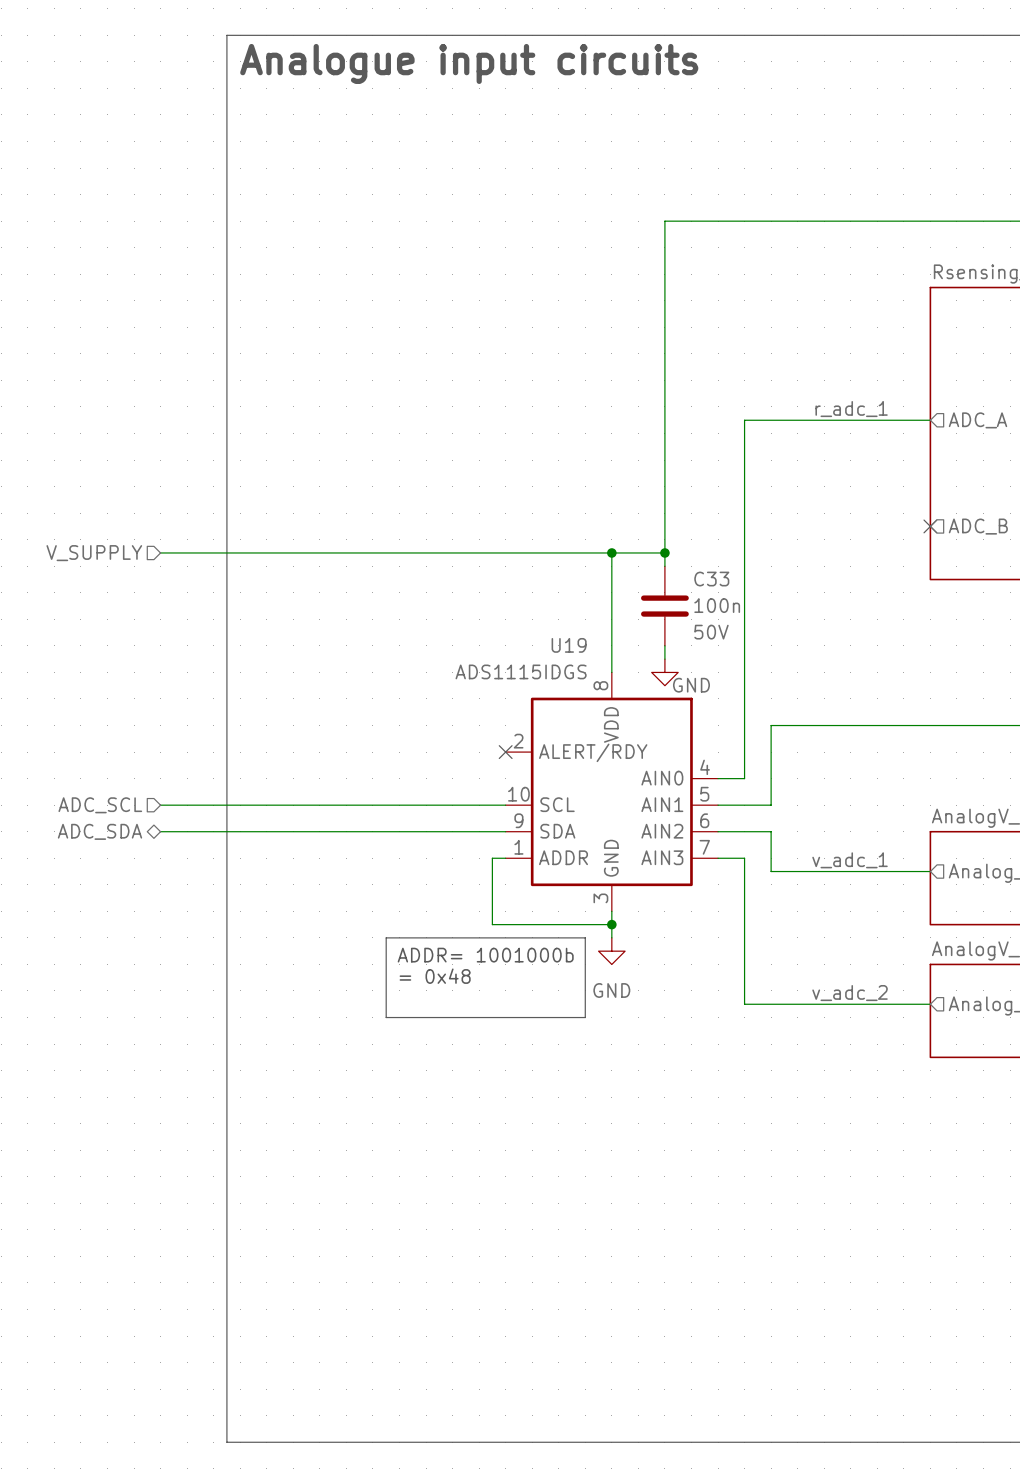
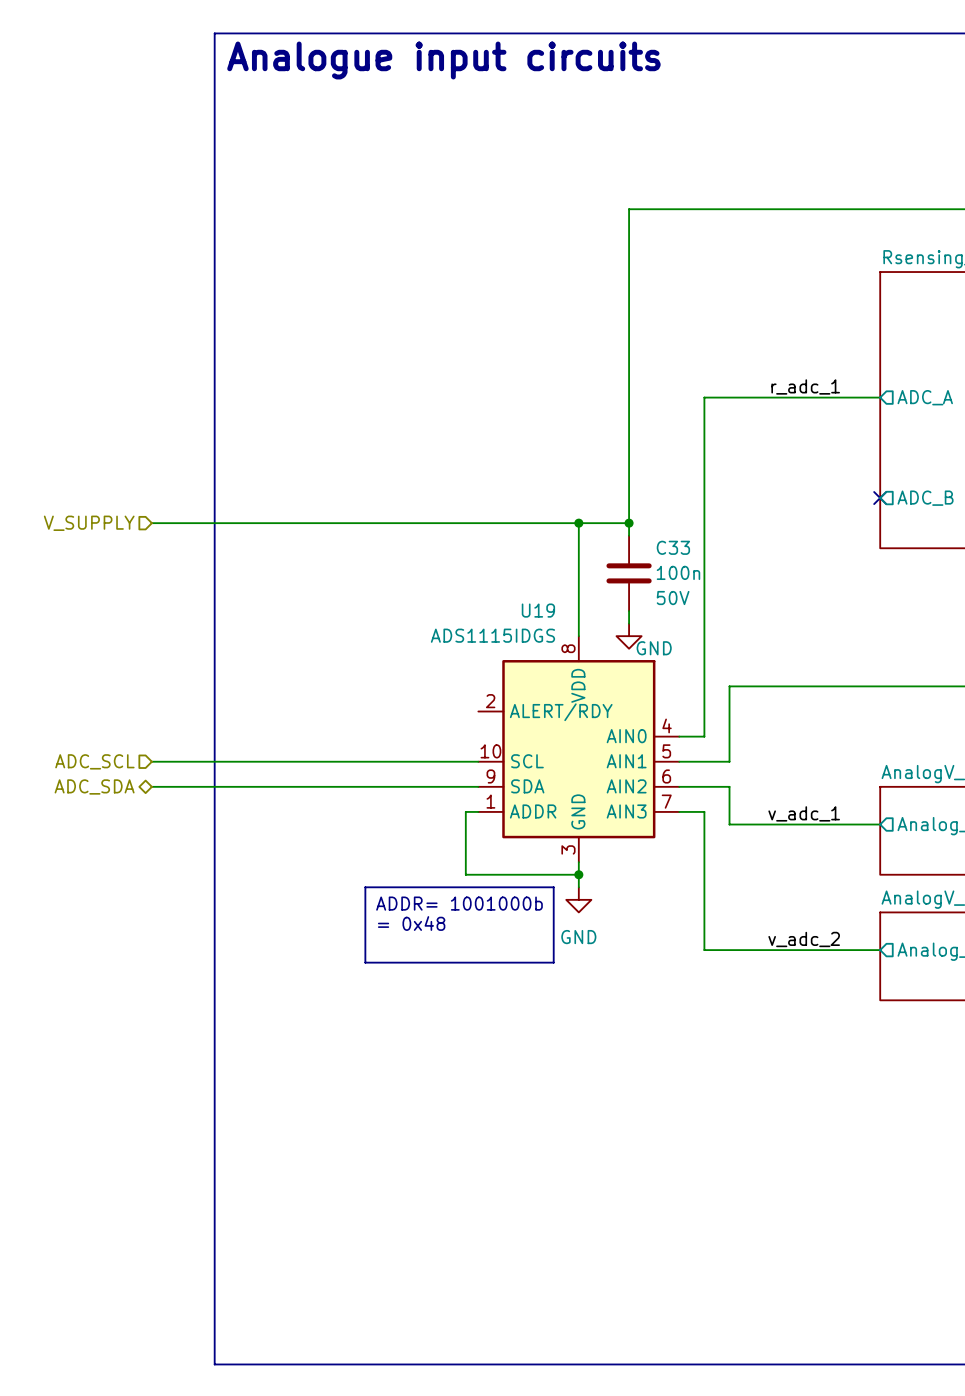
no-connect mark: (505, 752) -> none

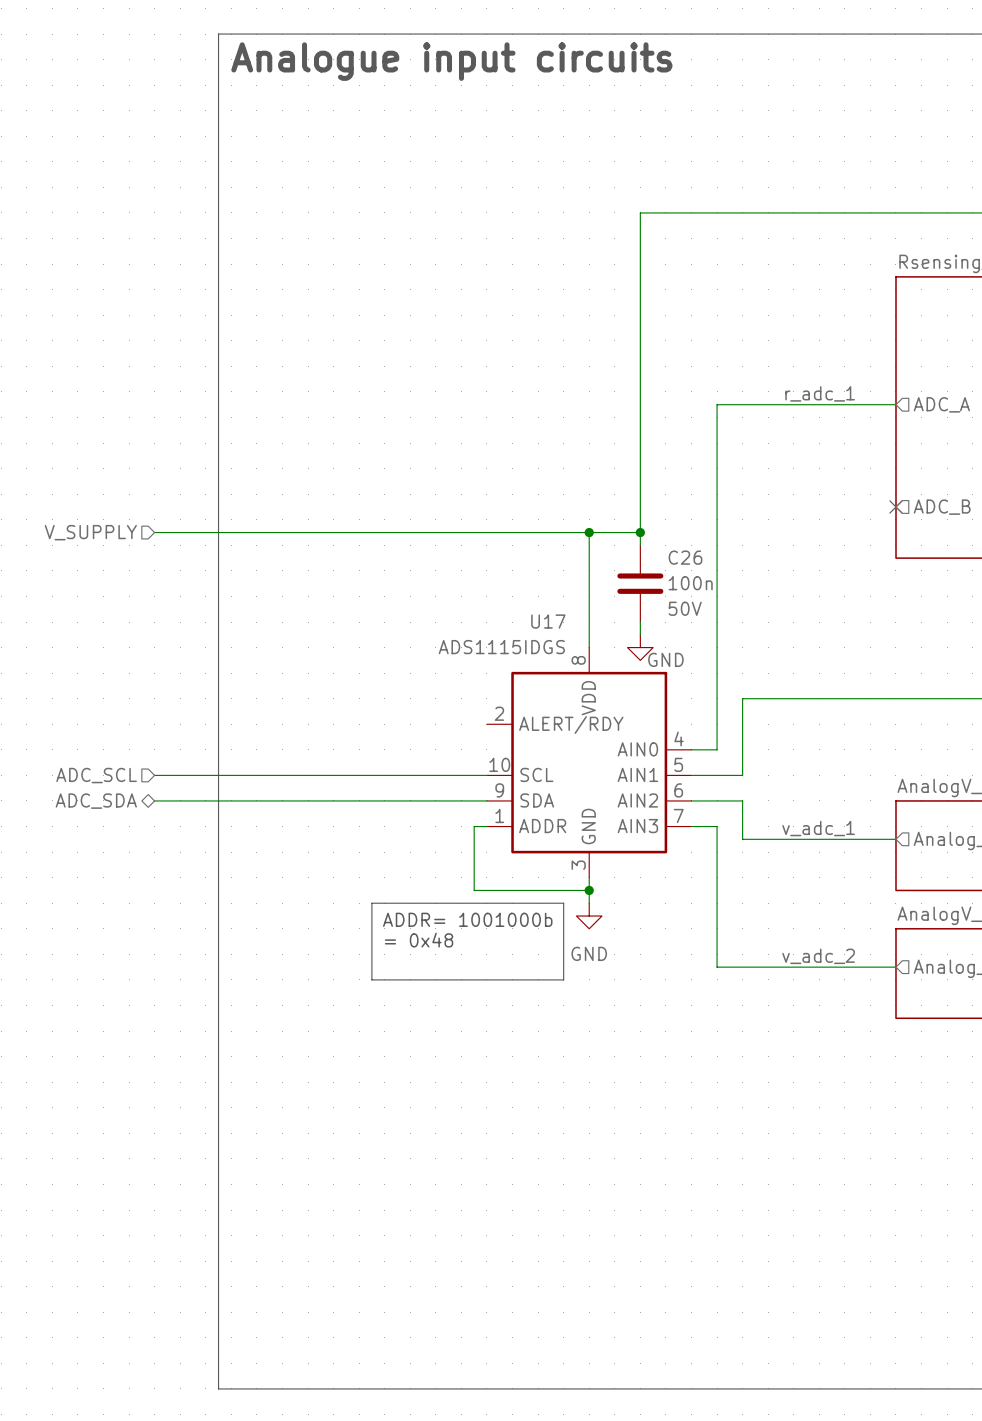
C33 name: C33 (673, 547) -> C26 (685, 557)
U19 name: U19 (538, 610) -> U17 (548, 621)

